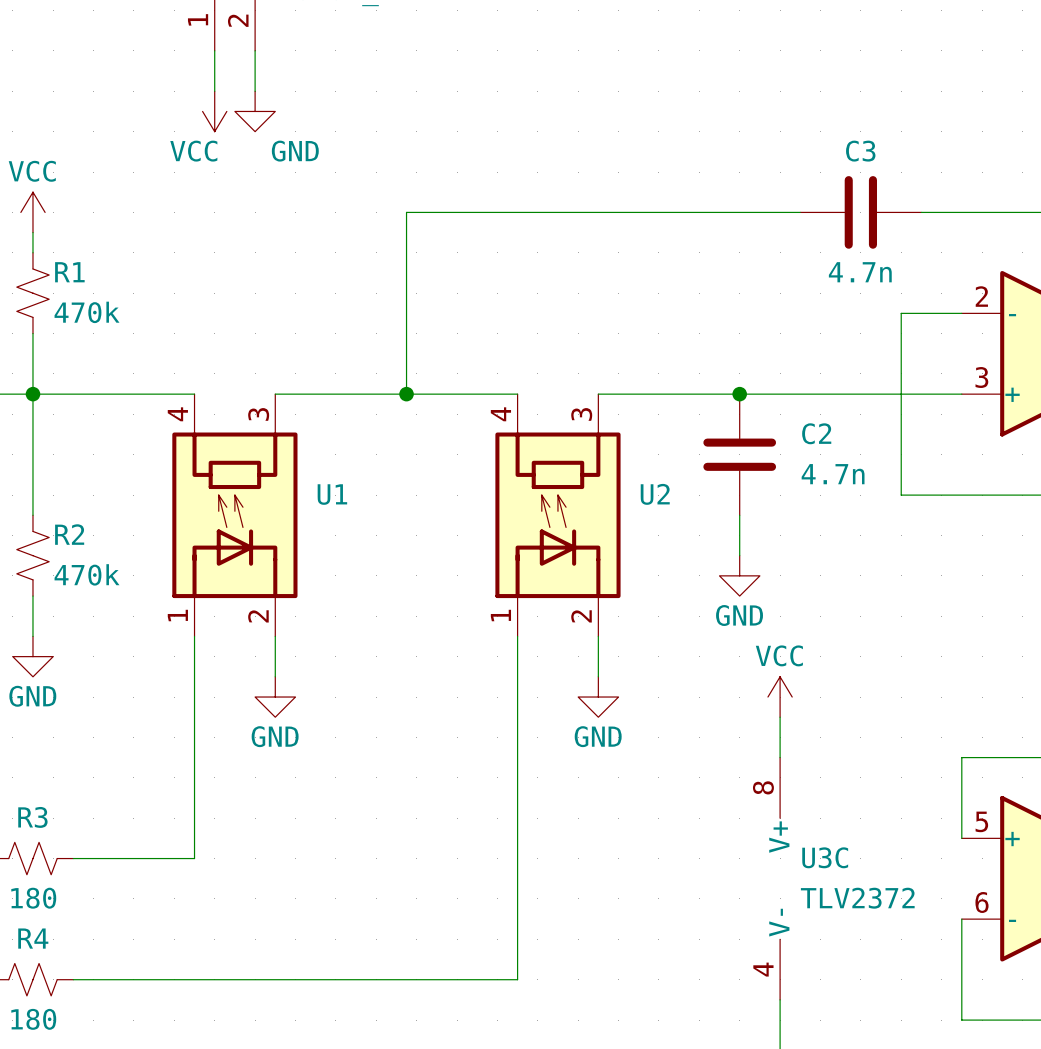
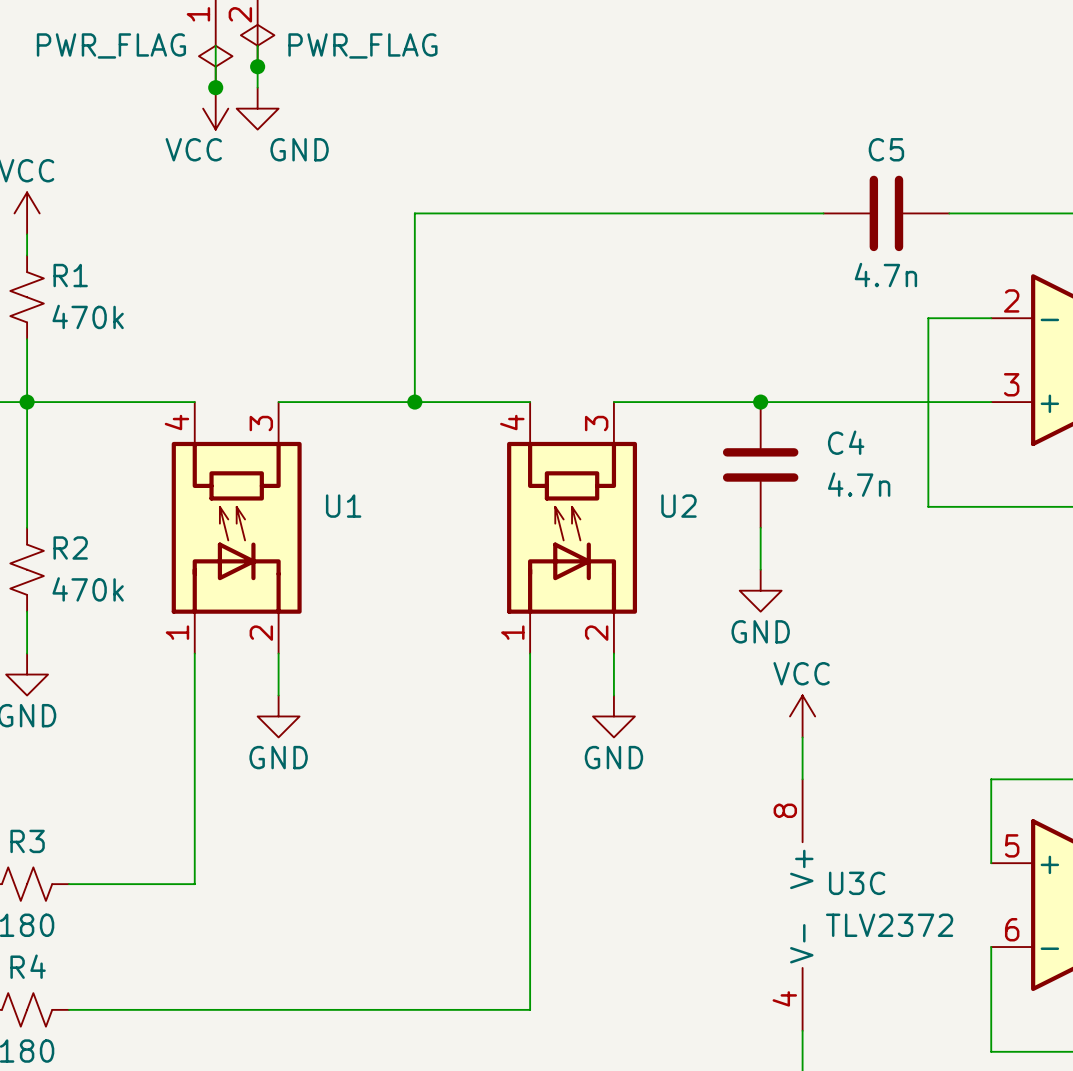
power symbol: none -> PWR_FLAG (257, 45)
power symbol: none -> PWR_FLAG (215, 66)
junction: none -> (257, 66)
junction: none -> (215, 87)
C3 name: C3 (860, 151) -> C5 (886, 149)
C2 name: C2 (816, 433) -> C4 (846, 442)

